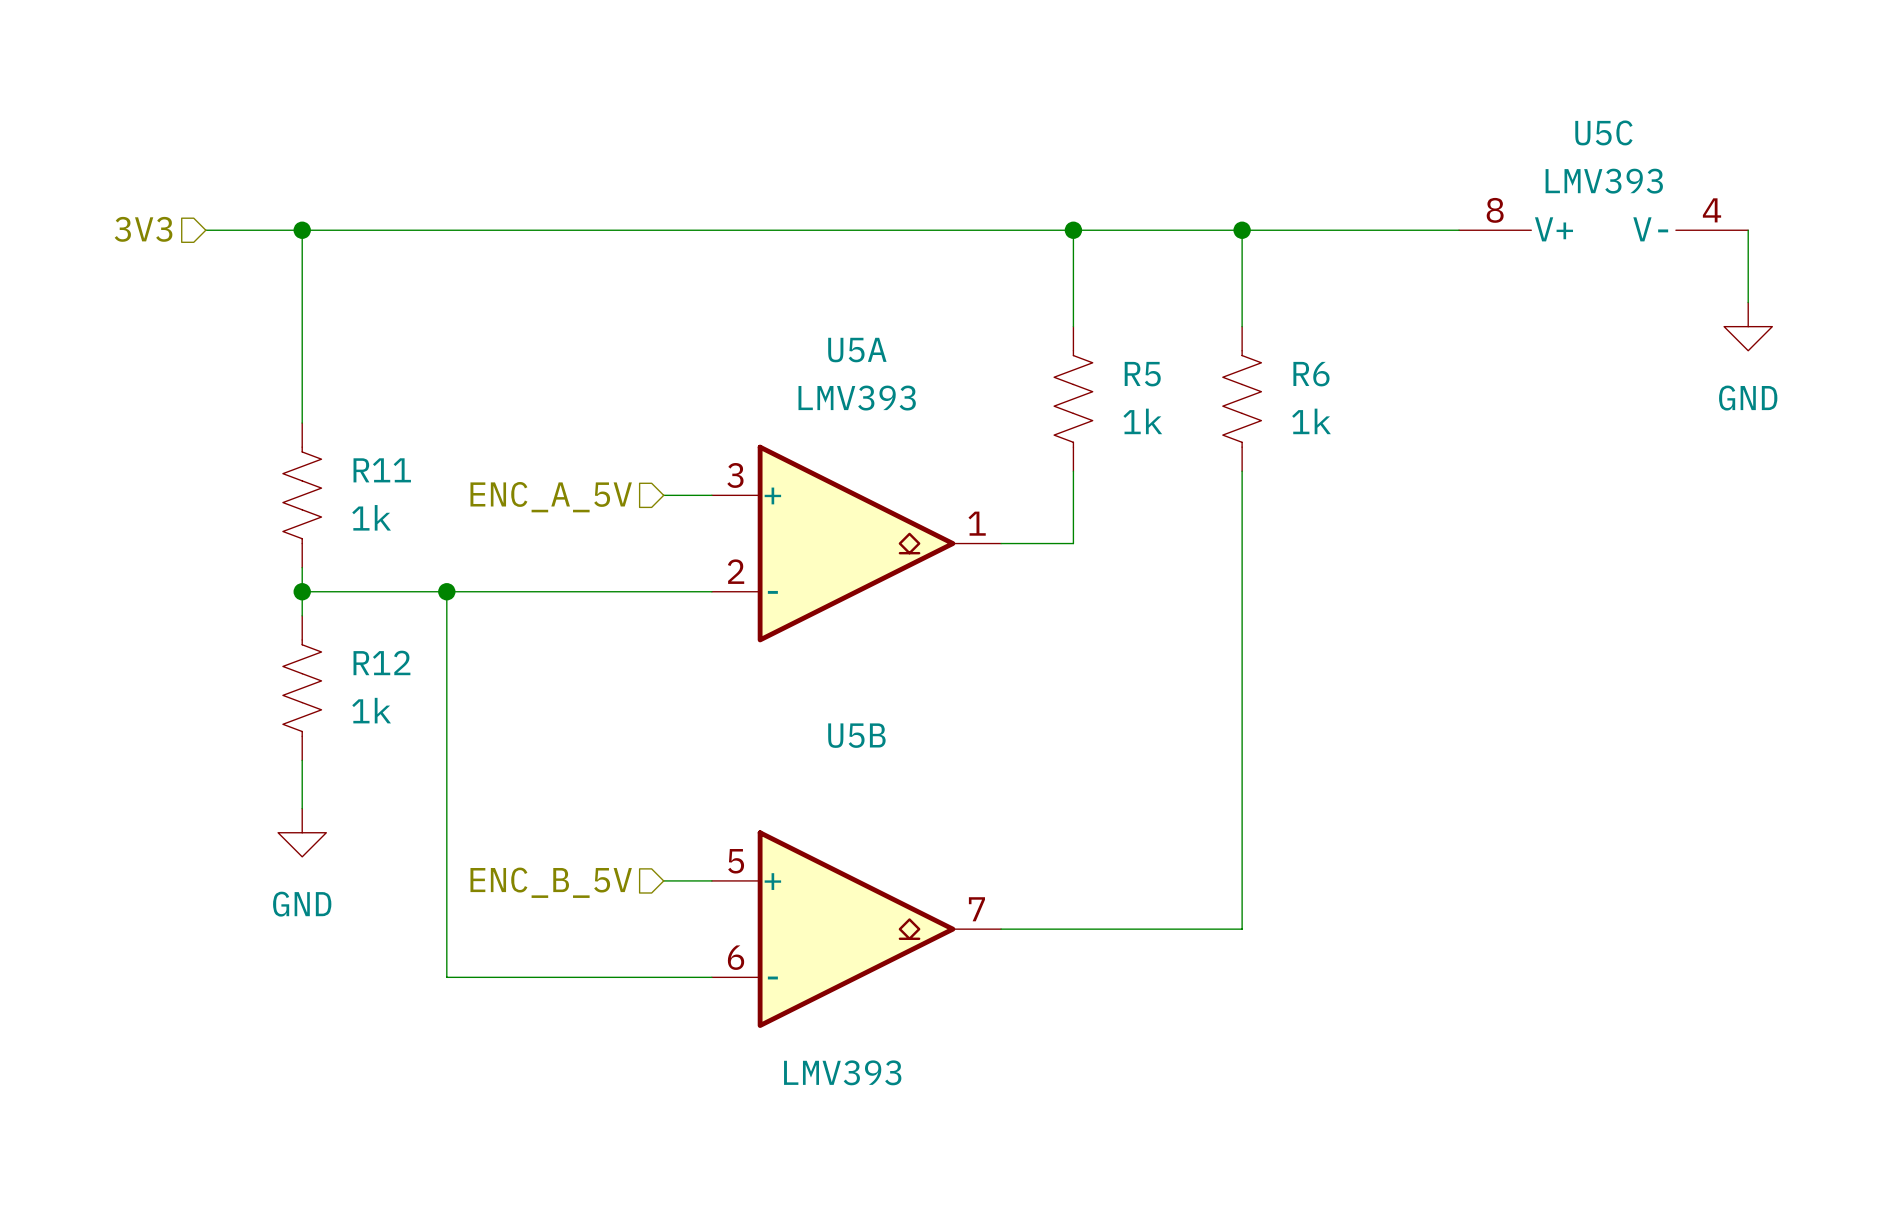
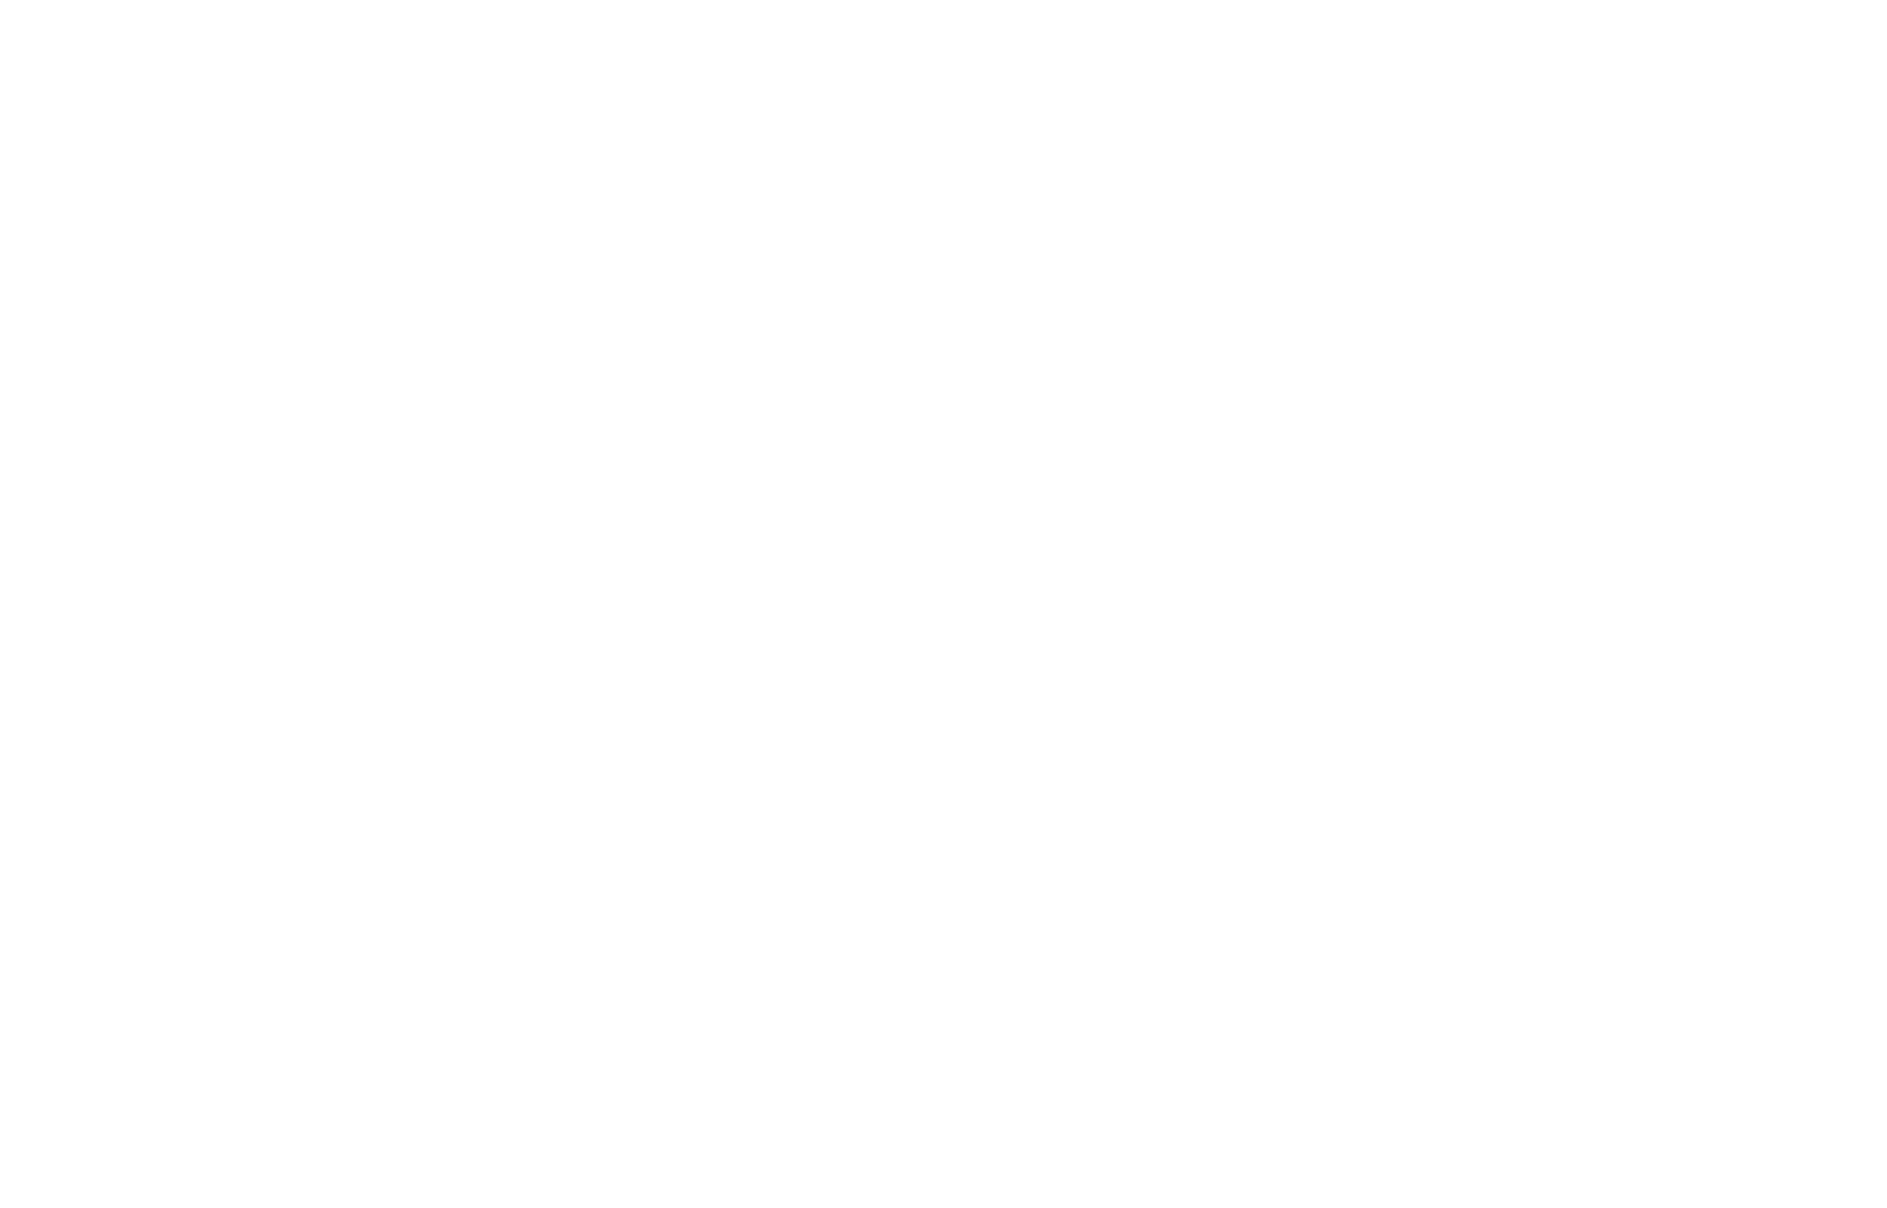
hierarchical label: 3V3 (143, 229) -> none
wire: (205, 230) (1459, 230) -> none
wire: (302, 230) (302, 423) -> none
junction: (302, 230) -> none
wire: (1073, 230) (1073, 326) -> none
junction: (1073, 230) -> none
wire: (1242, 230) (1242, 326) -> none
junction: (1242, 230) -> none
U5C: LMV393 (1603, 230) -> none
wire: (1748, 230) (1748, 302) -> none
power symbol: GND (1748, 326) -> none
R5: 1k (1073, 398) -> none
R6: 1k (1242, 398) -> none
wire: (1073, 471) (1073, 543) (1001, 543) -> none
wire: (1242, 471) (1242, 929) (1001, 929) -> none
R11: 1k (302, 495) -> none
wire: (663, 495) (711, 495) -> none
hierarchical label: ENC_A_5V (551, 497) -> none
U5A: LMV393 (856, 543) -> none
wire: (302, 567) (302, 615) -> none
wire: (302, 591) (711, 591) -> none
junction: (302, 591) -> none
wire: (446, 591) (446, 977) (711, 977) -> none
junction: (446, 591) -> none
R12: 1k (302, 688) -> none
wire: (302, 760) (302, 808) -> none
power symbol: GND (302, 832) -> none
wire: (663, 880) (711, 880) -> none
hierarchical label: ENC_B_5V (551, 882) -> none
U5B: LMV393 (856, 929) -> none

